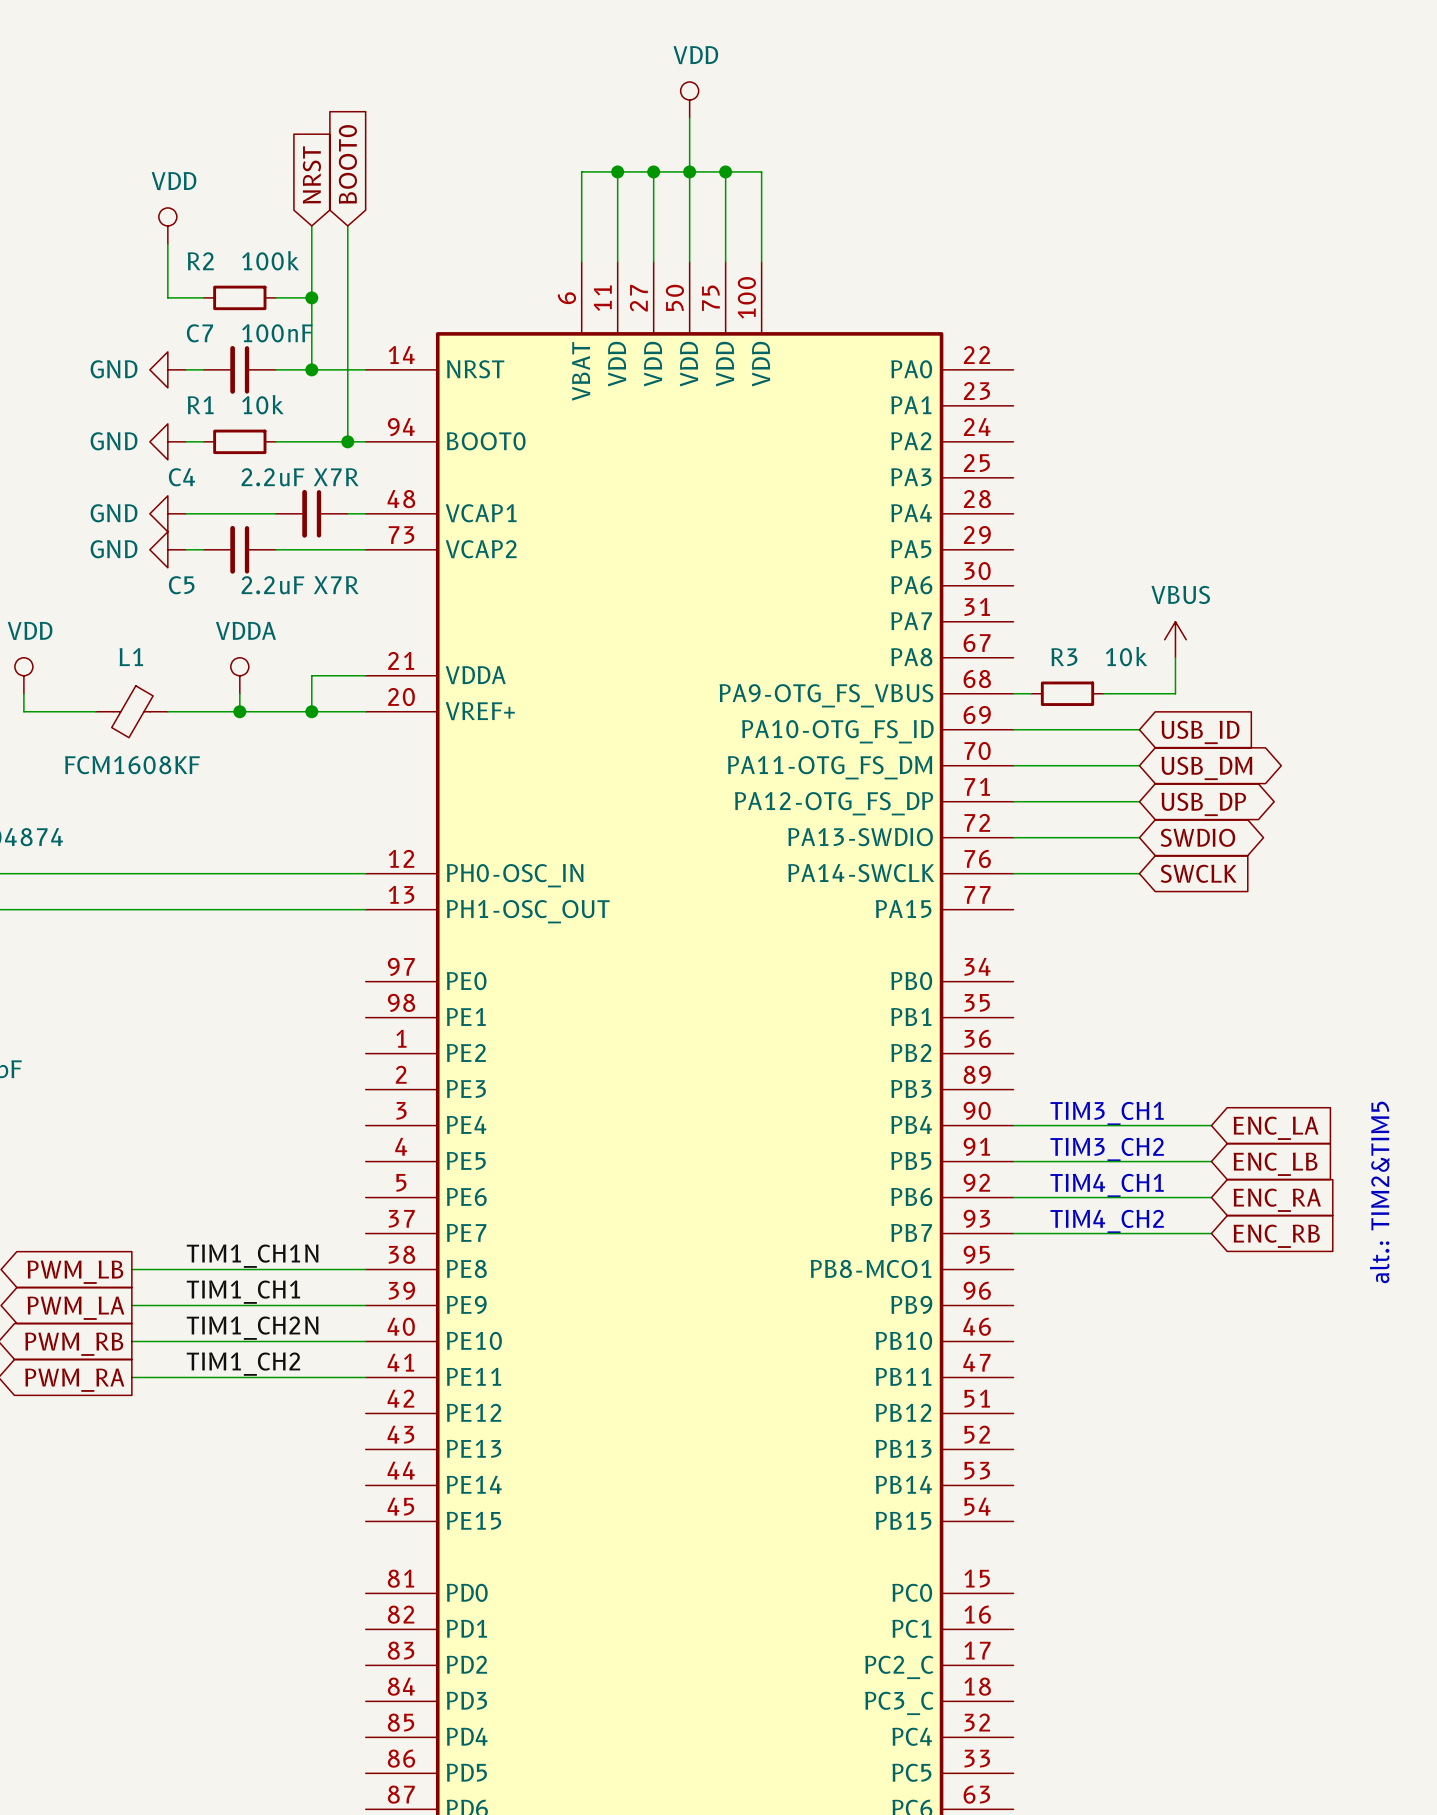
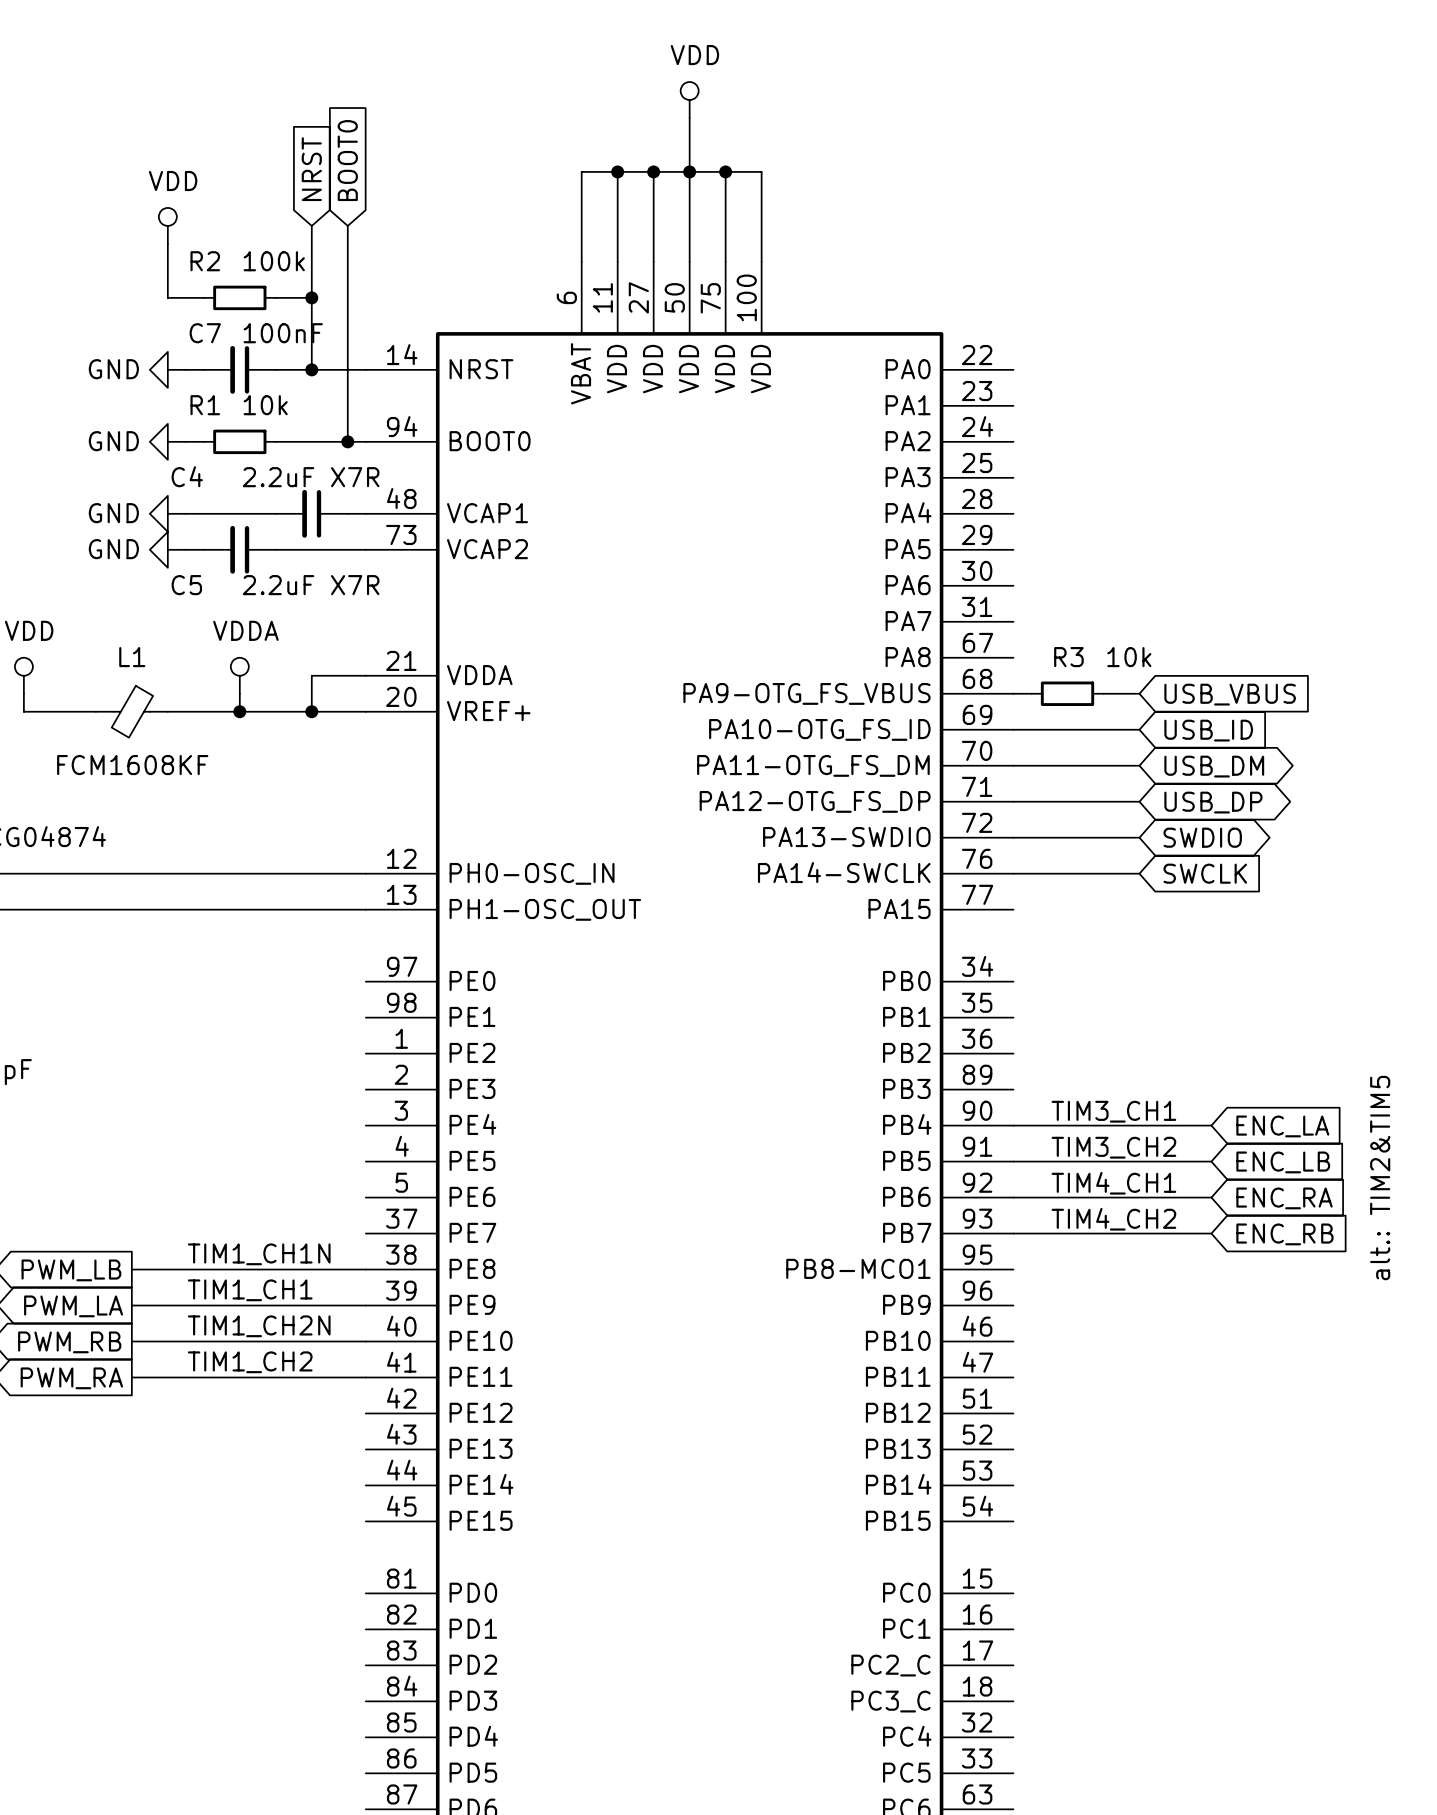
power symbol: VBUS (1175, 639) -> none
wire: (1175, 657) (1175, 693) (1139, 693) -> none
global label: none -> USB_VBUS (1230, 694)

